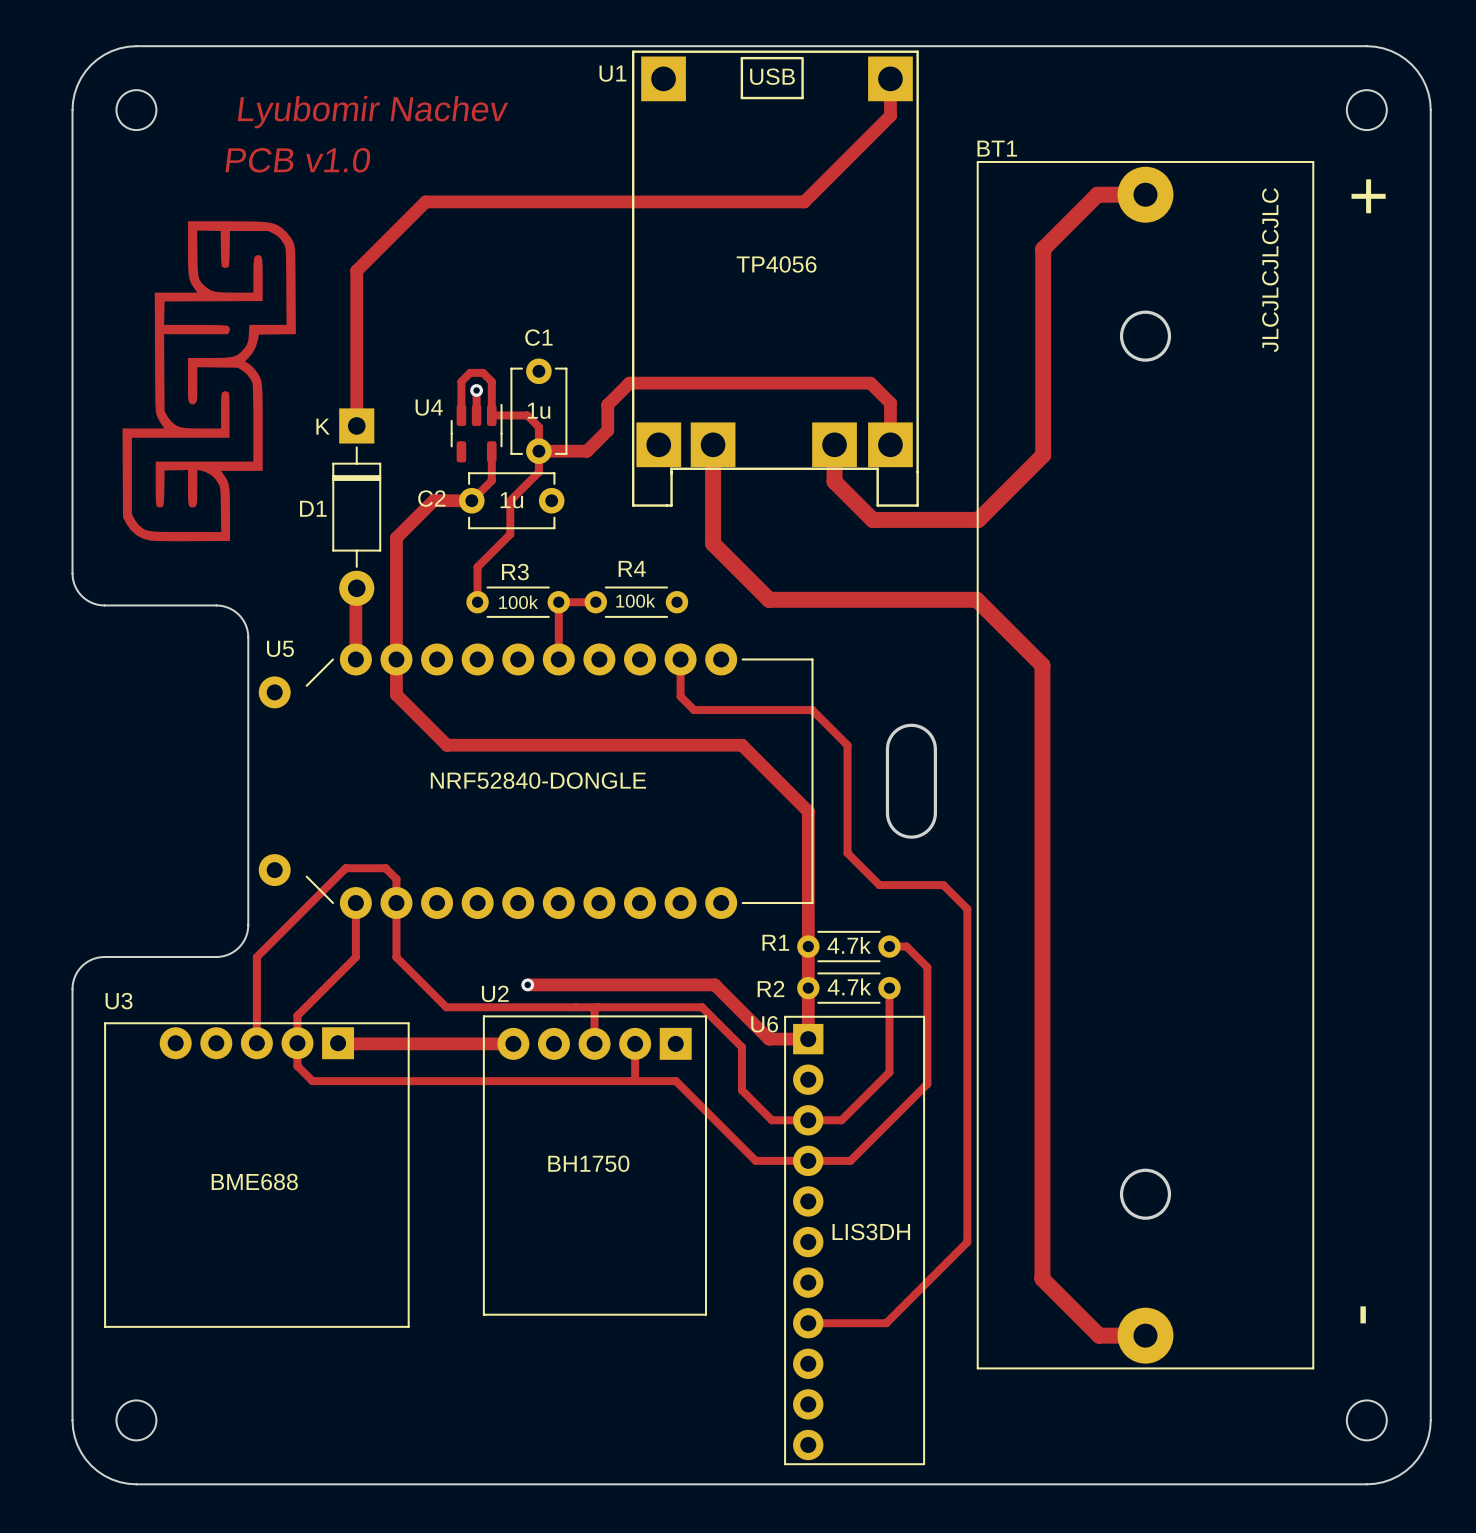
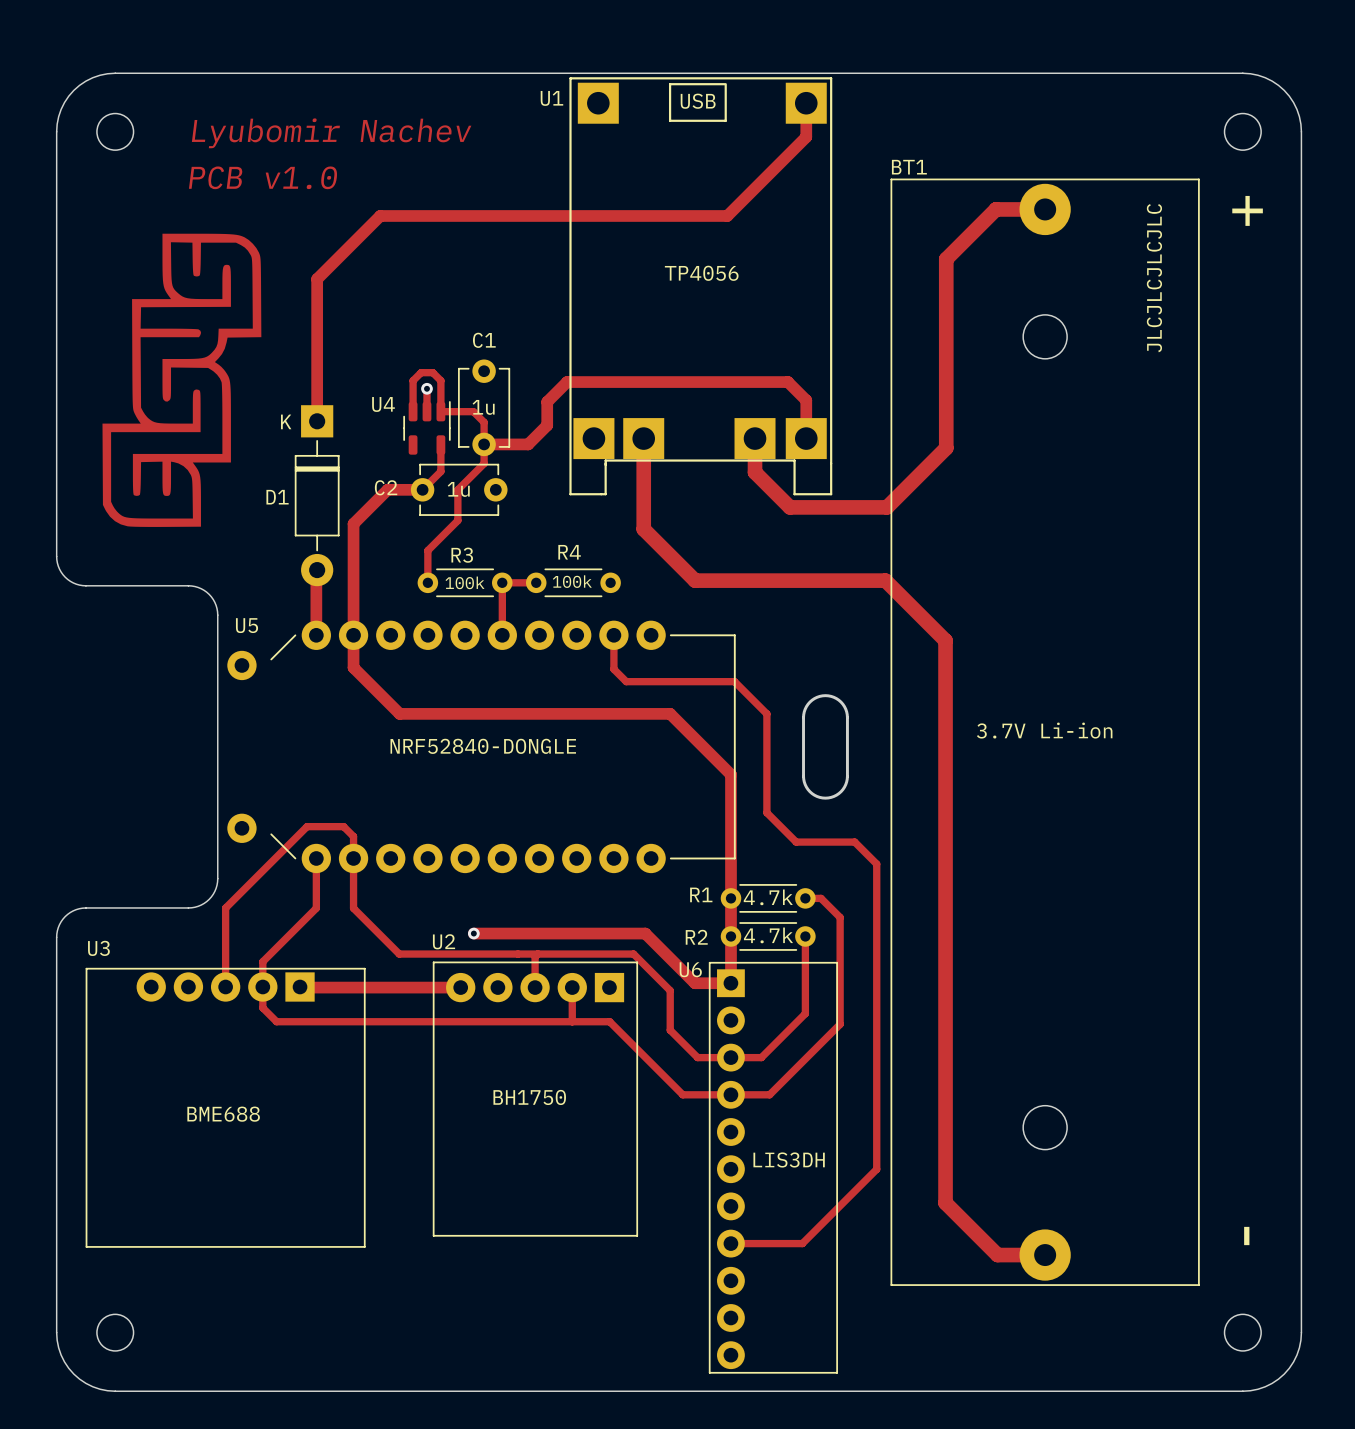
BT1 footprint: [976, 161, 1315, 1370] -> [890, 178, 1200, 1286]
round board edge: none -> [1022, 314, 1068, 360]
BT1 value: none -> 3.7V Li-ion (1044, 730)
round board edge: none -> [1022, 1104, 1068, 1151]

